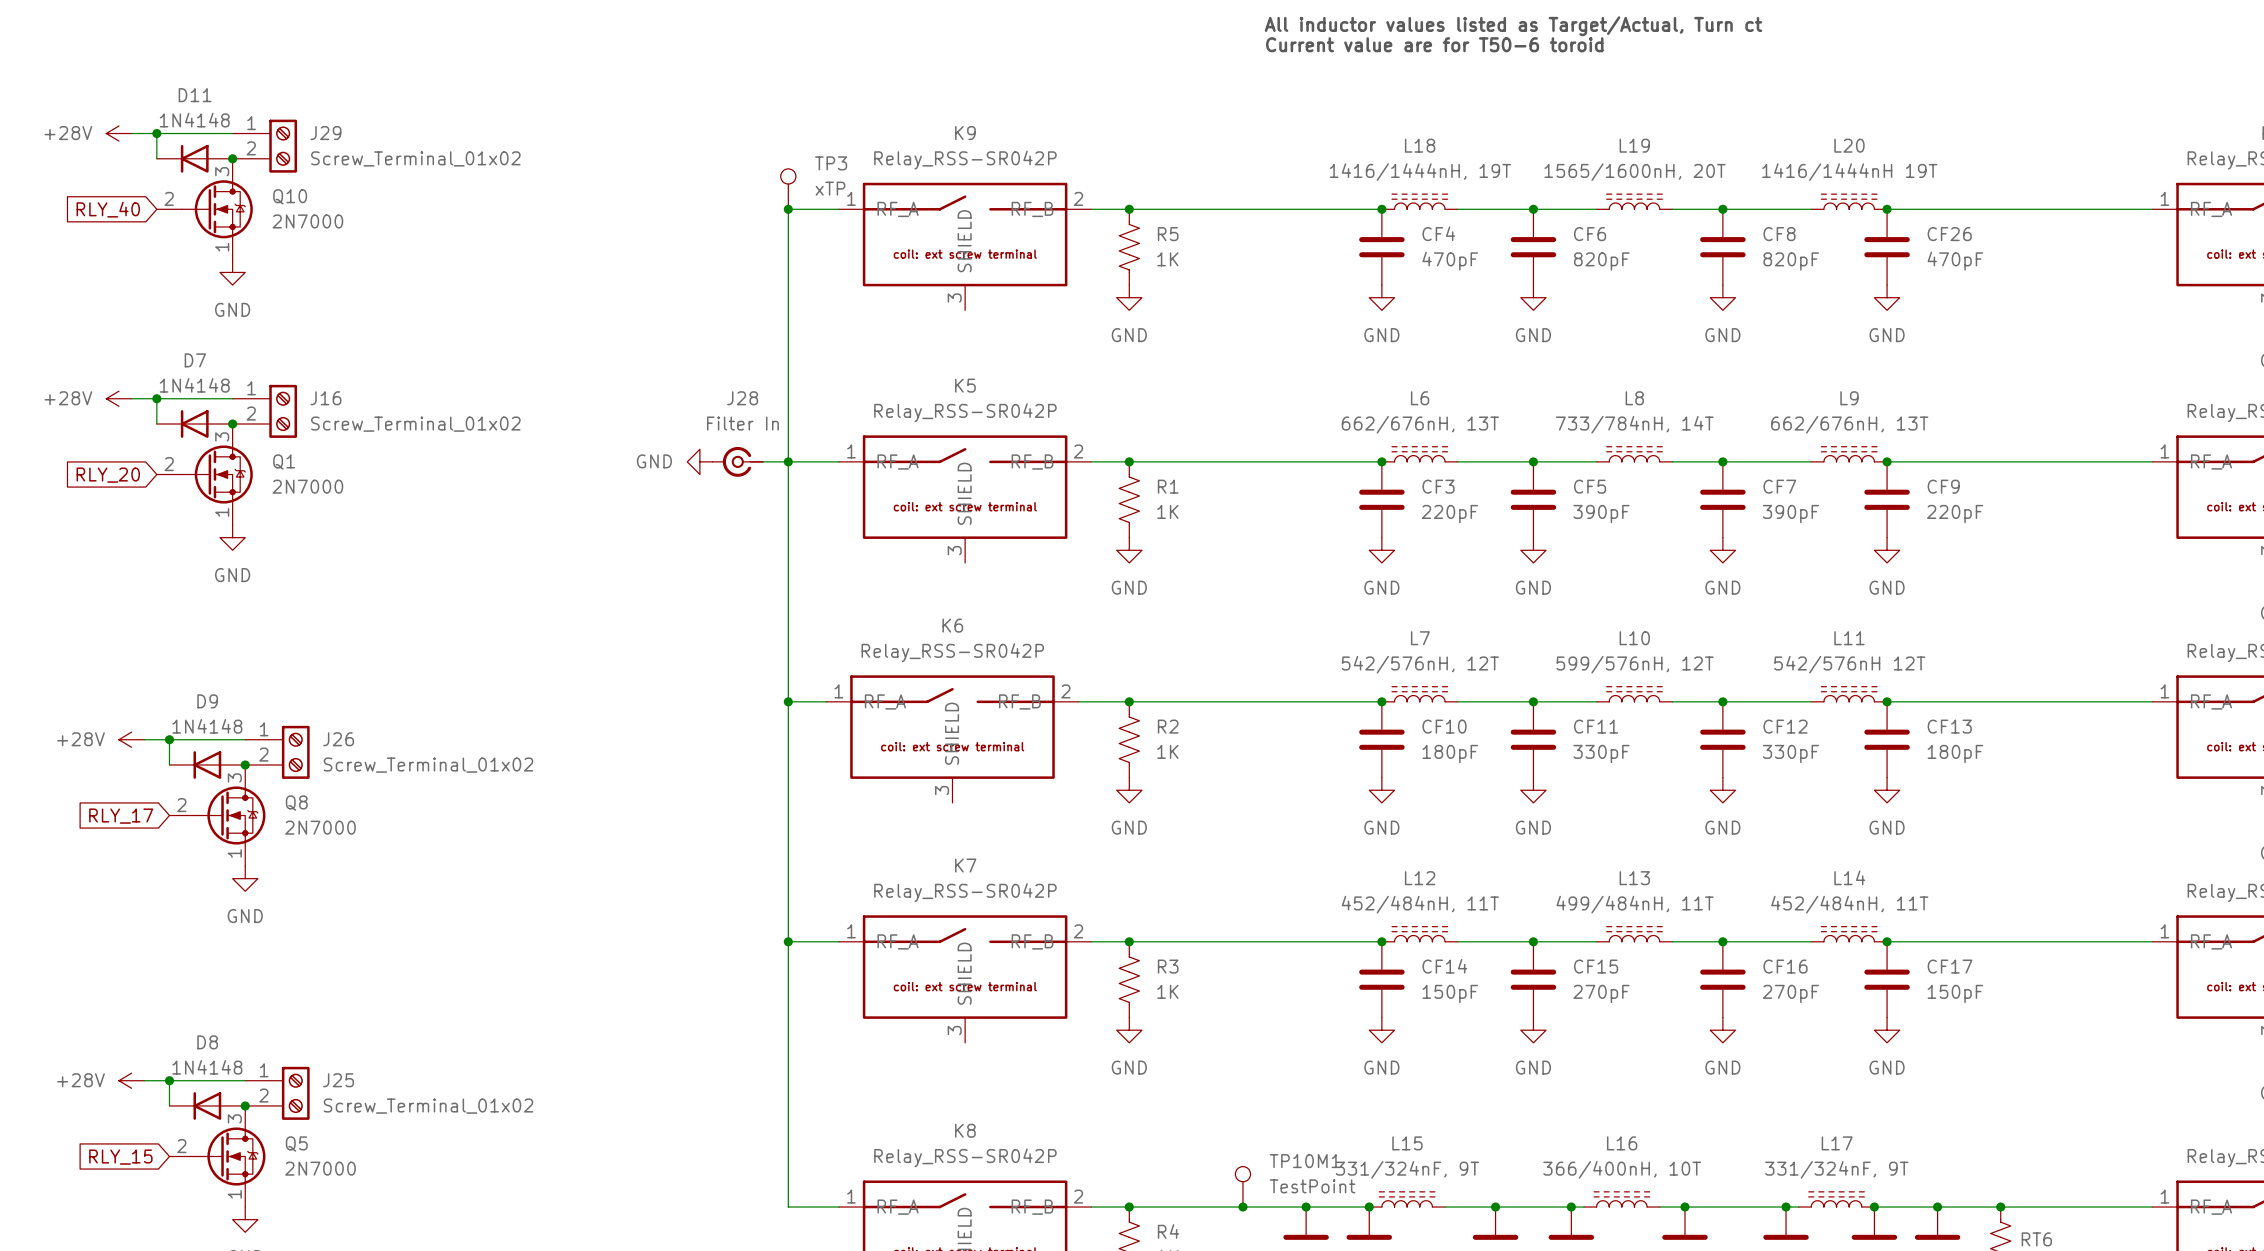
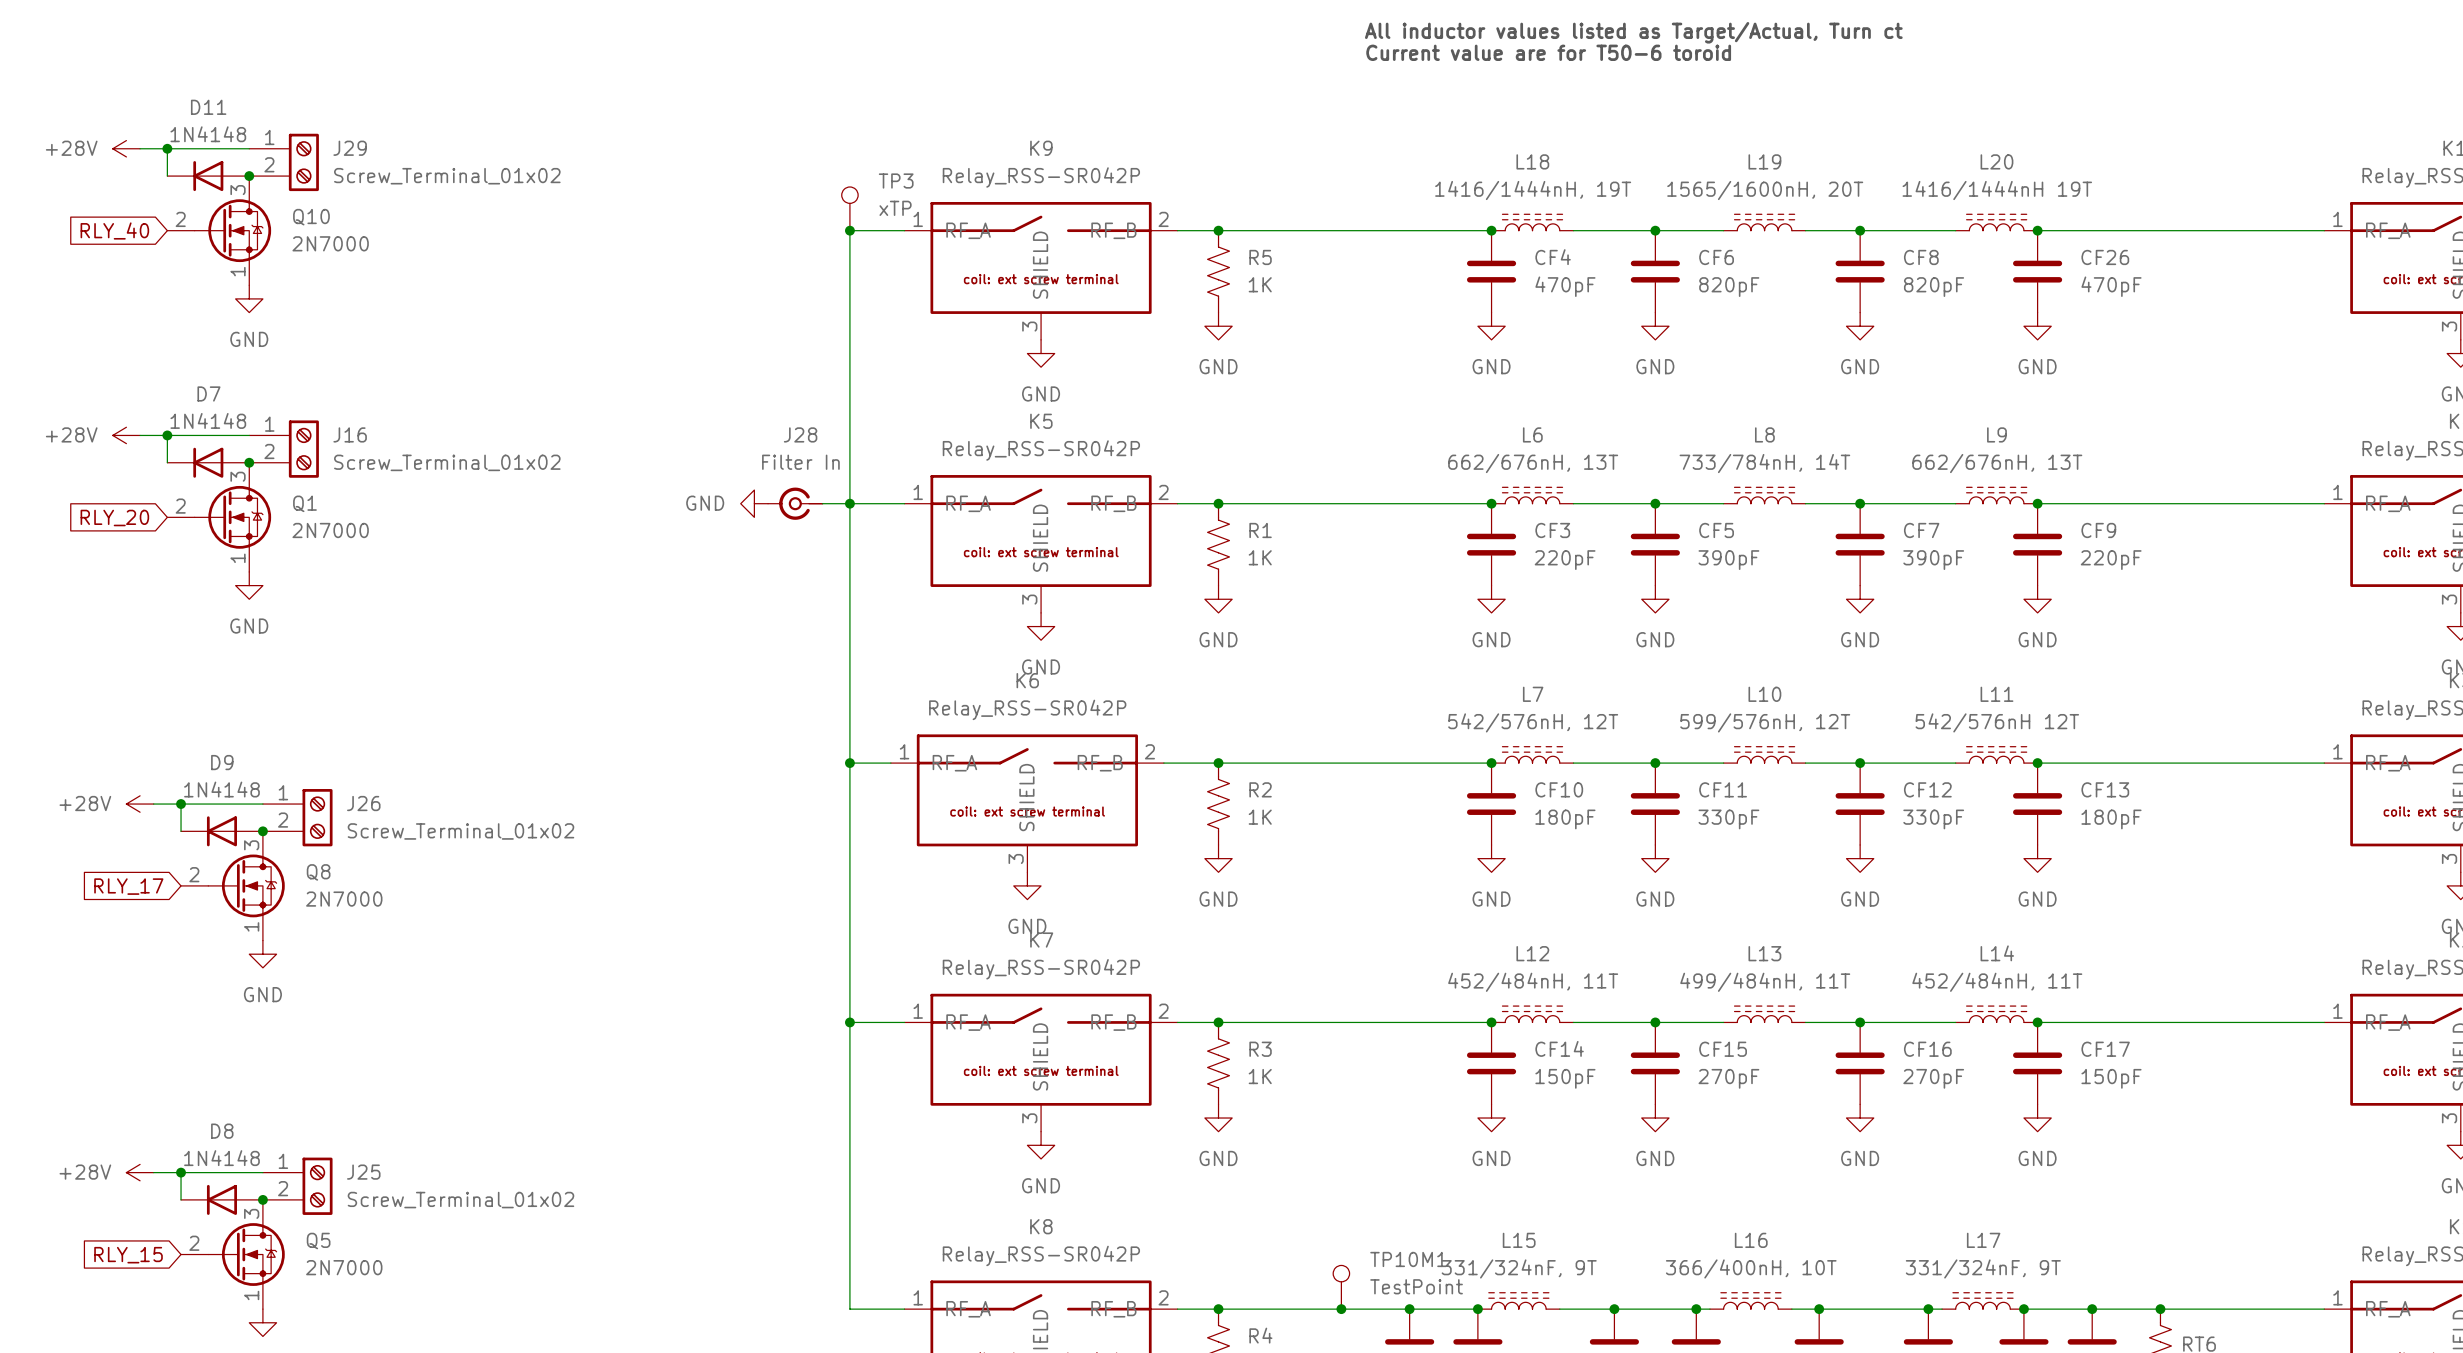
power symbol: none -> GND (1041, 353)
power symbol: none -> GND (1041, 626)
power symbol: none -> GND (1027, 885)
power symbol: none -> GND (1041, 1145)

